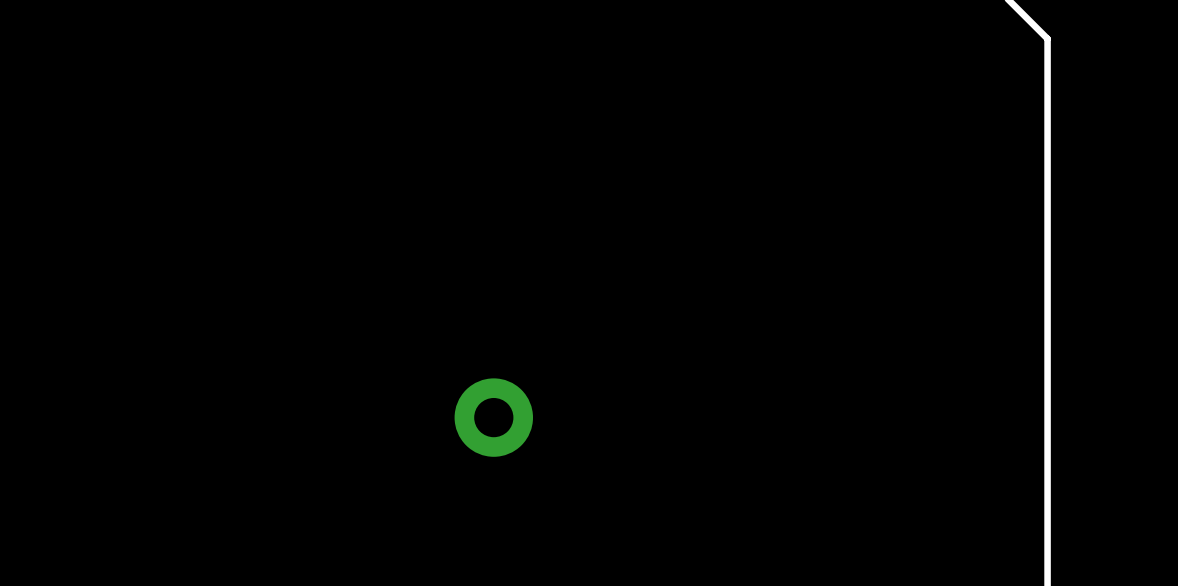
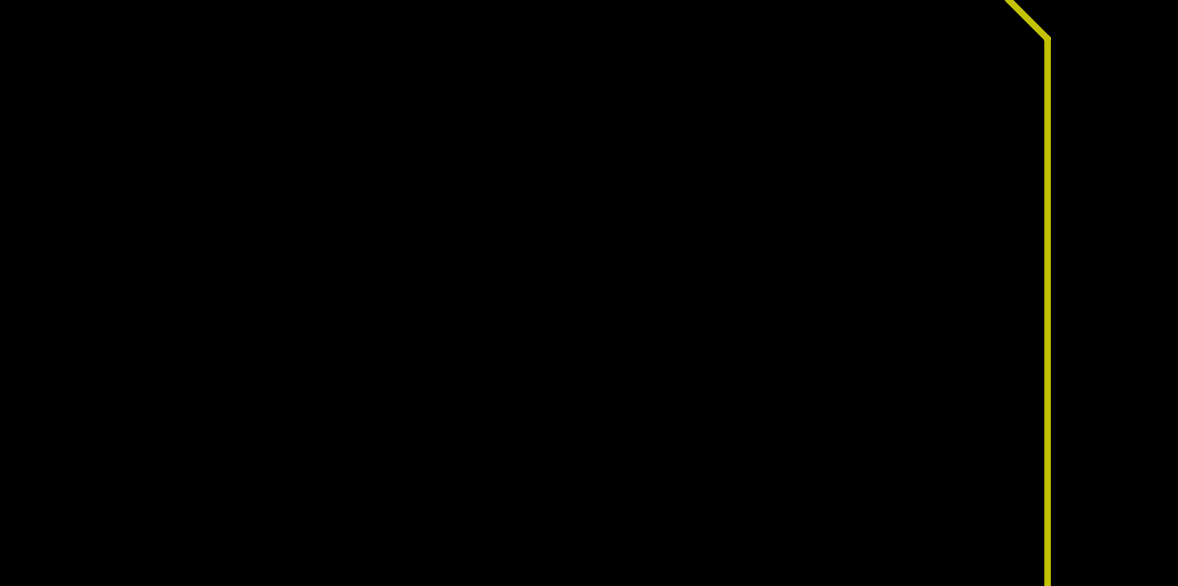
via: (493, 417) -> none

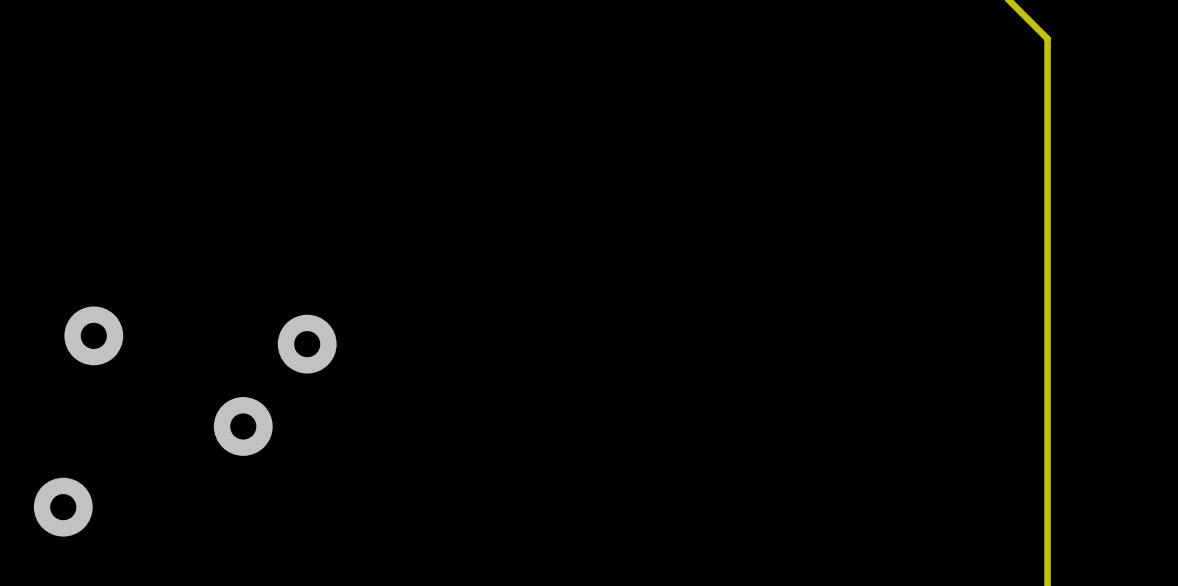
via: none -> (93, 335)
via: none -> (307, 344)
via: none -> (243, 426)
via: none -> (63, 507)

